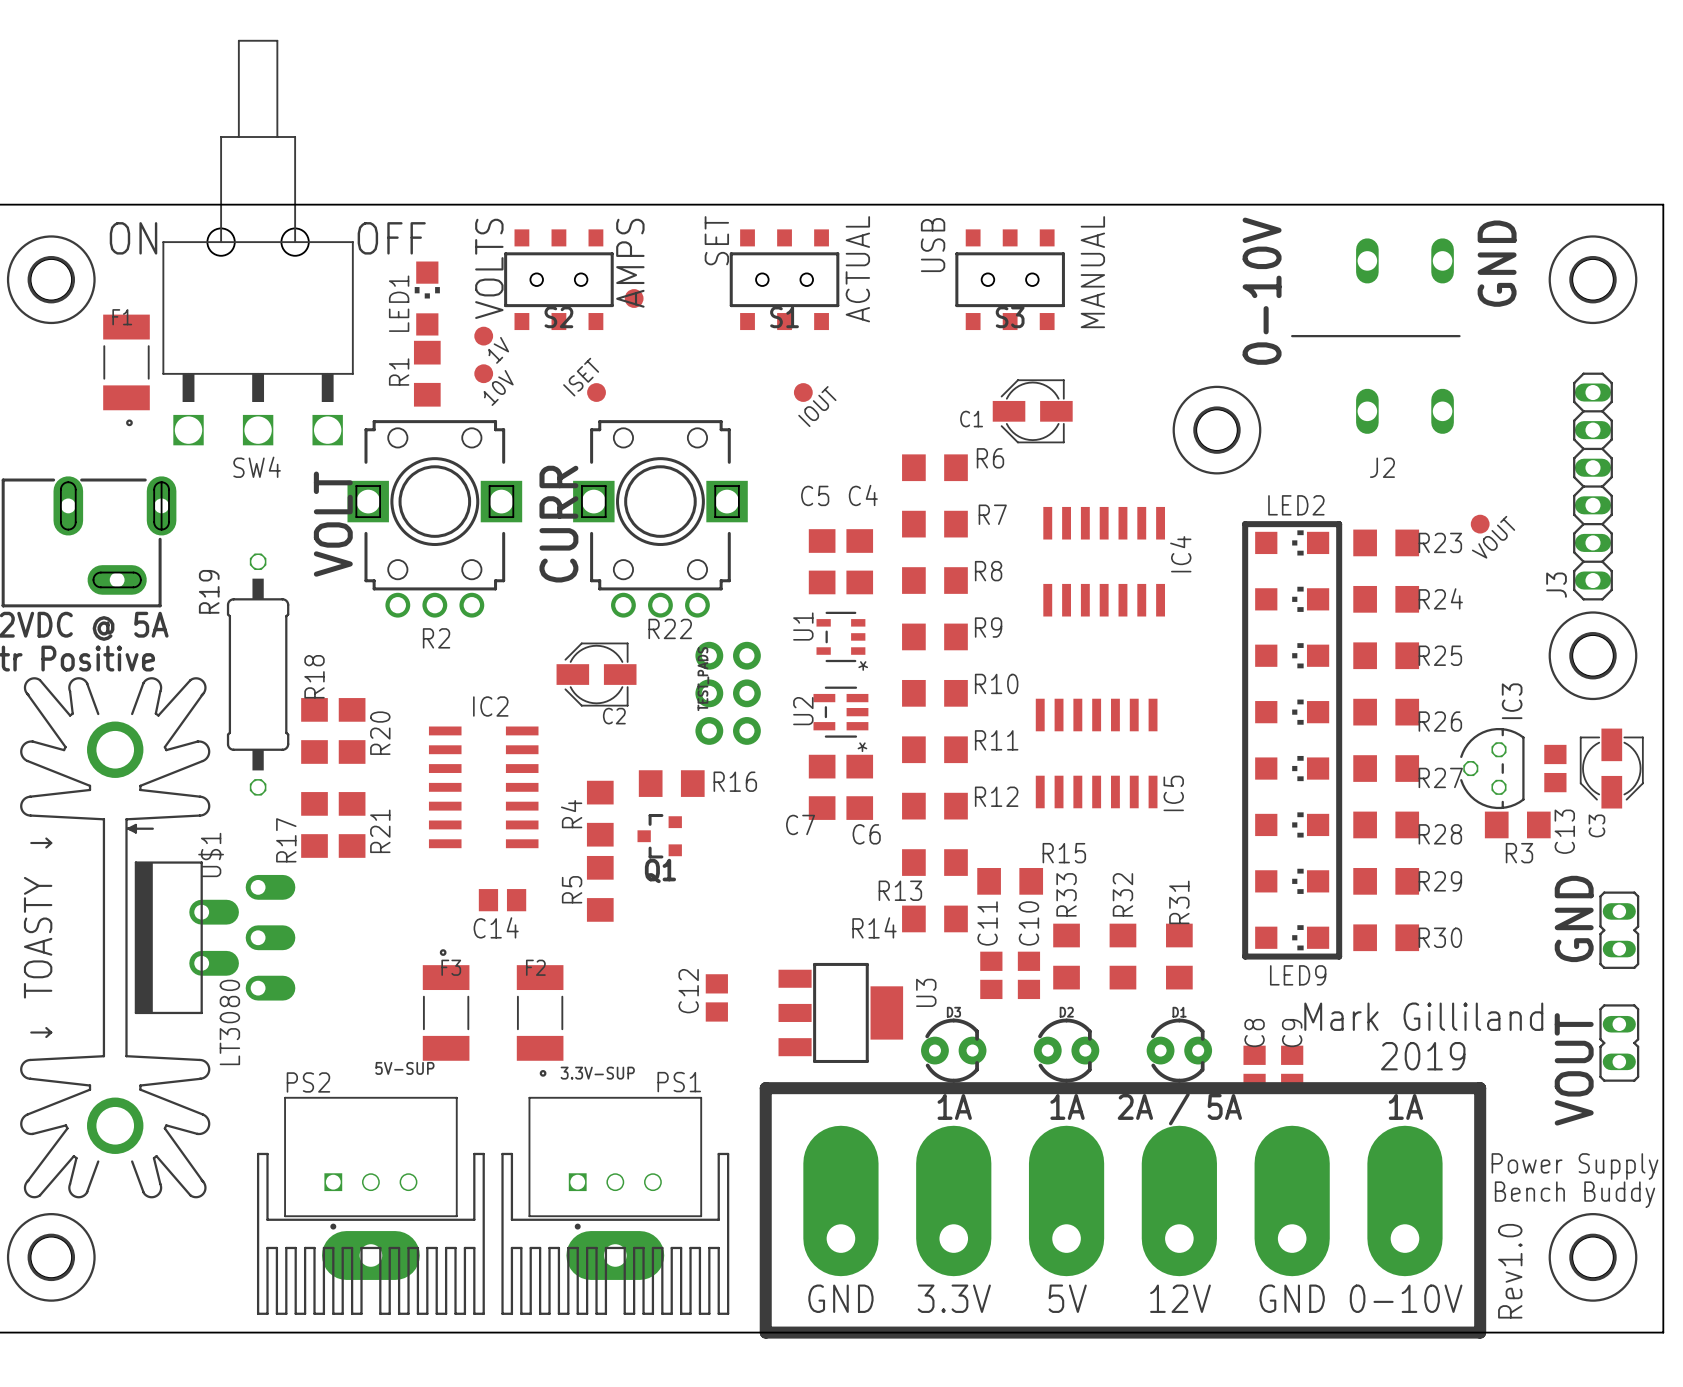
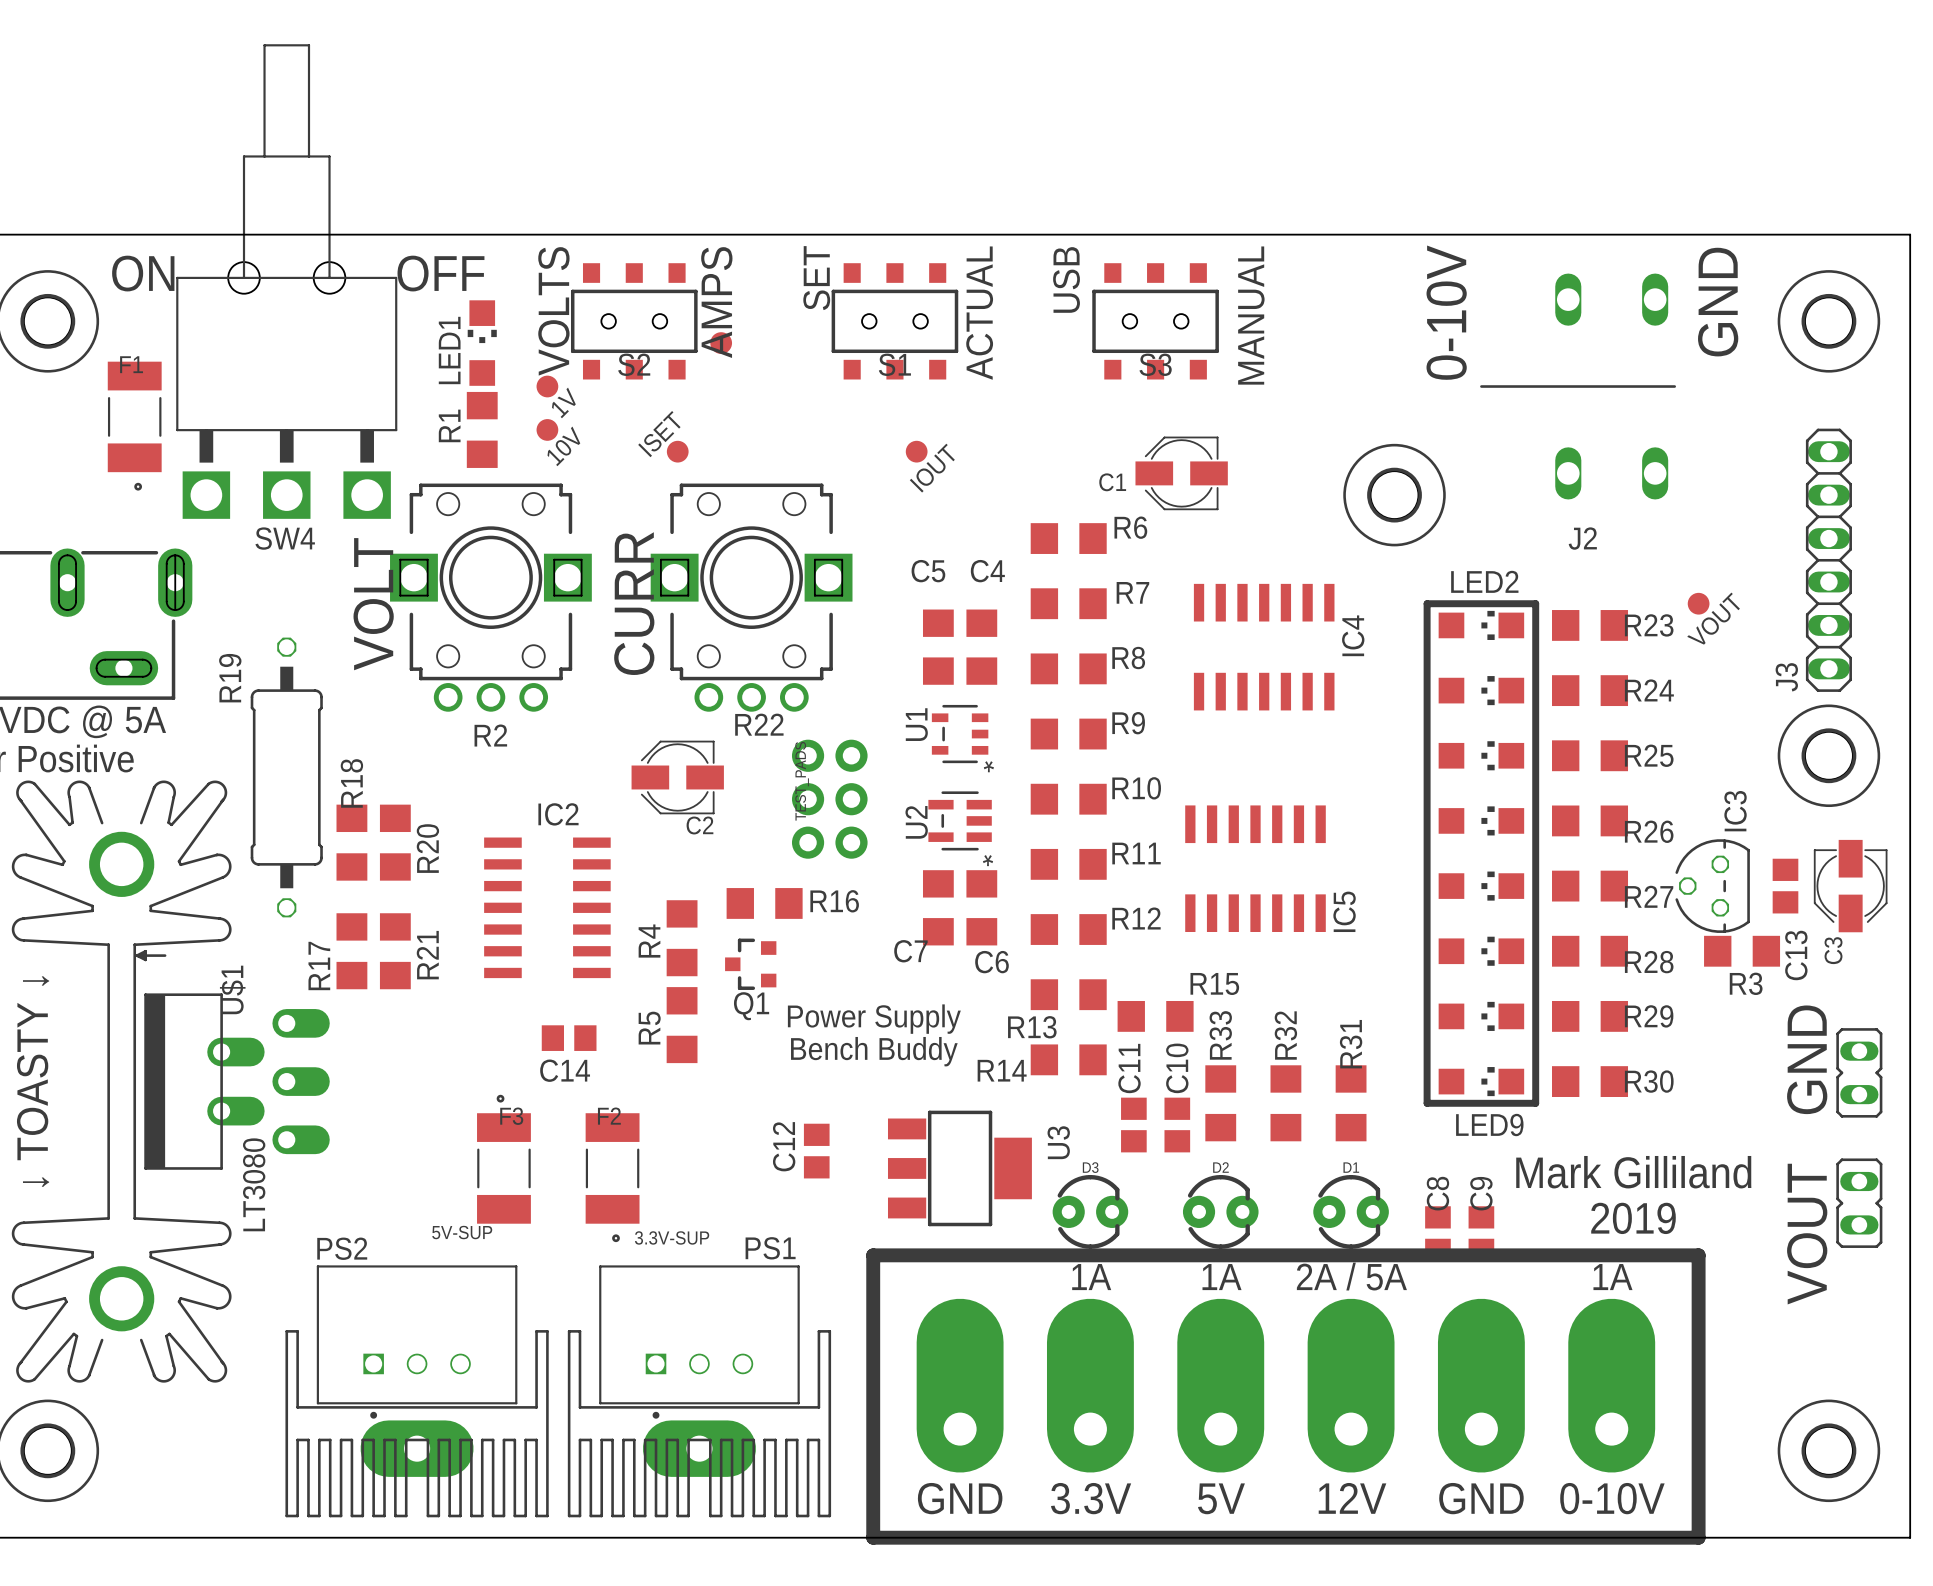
SW4 footprint: [162, 39, 354, 446] -> [176, 44, 398, 519]
text: none -> Power Supply (874, 1019)
text: none -> Bench Buddy (874, 1051)
text: Power Supply (1574, 1166) -> none
text: Bench Buddy (1574, 1194) -> none
text: Rev1.0 (1510, 1271) -> none

